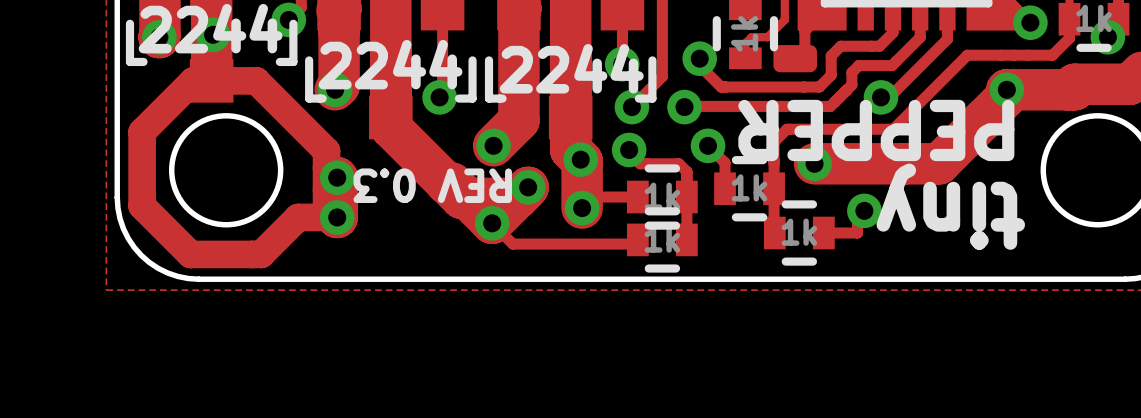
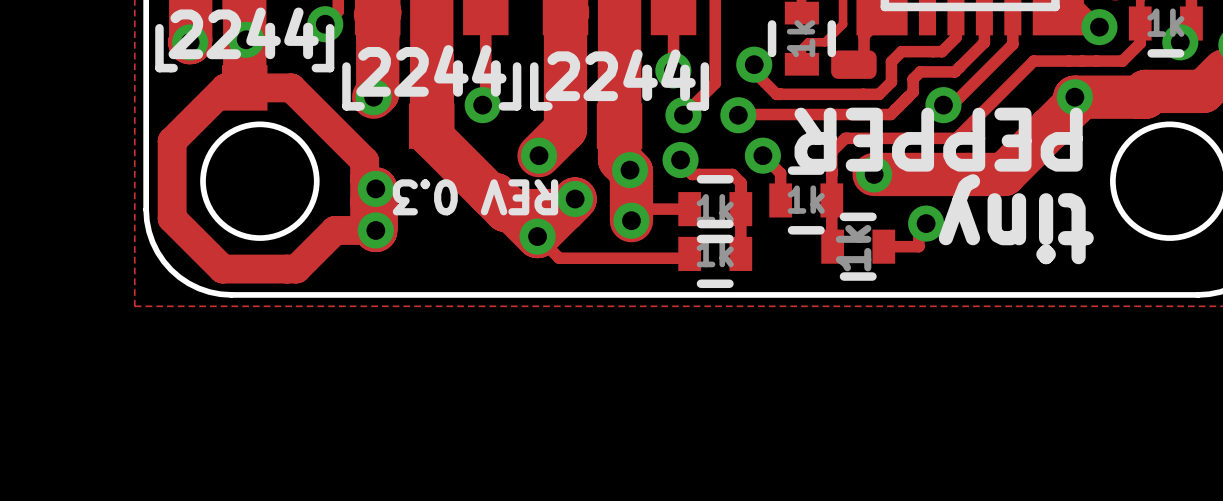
part value rotation: 0° (799, 232) -> 90° counterclockwise (853, 248)

